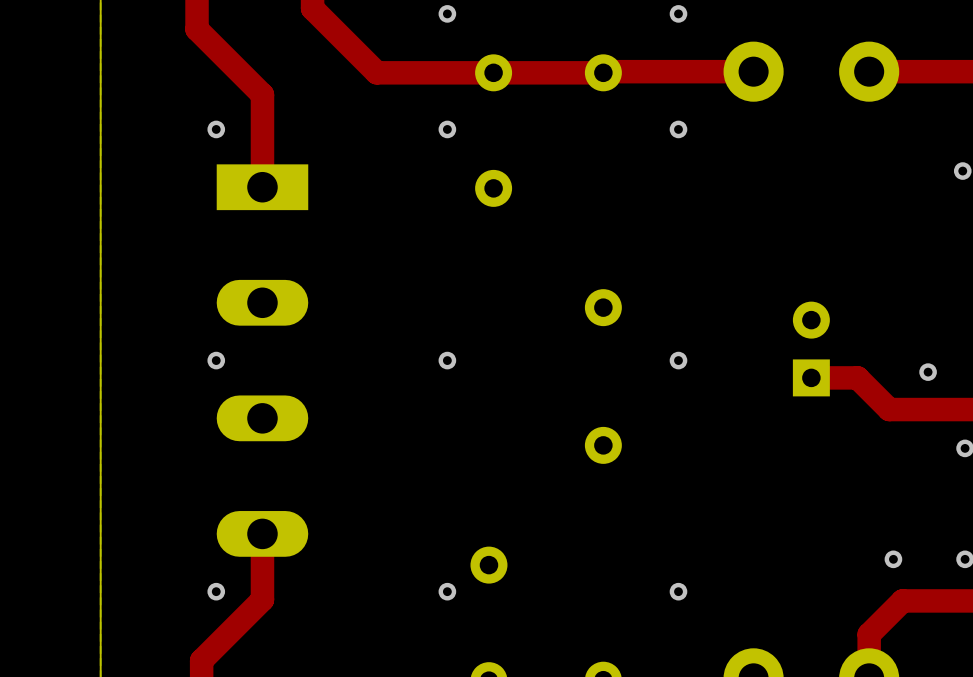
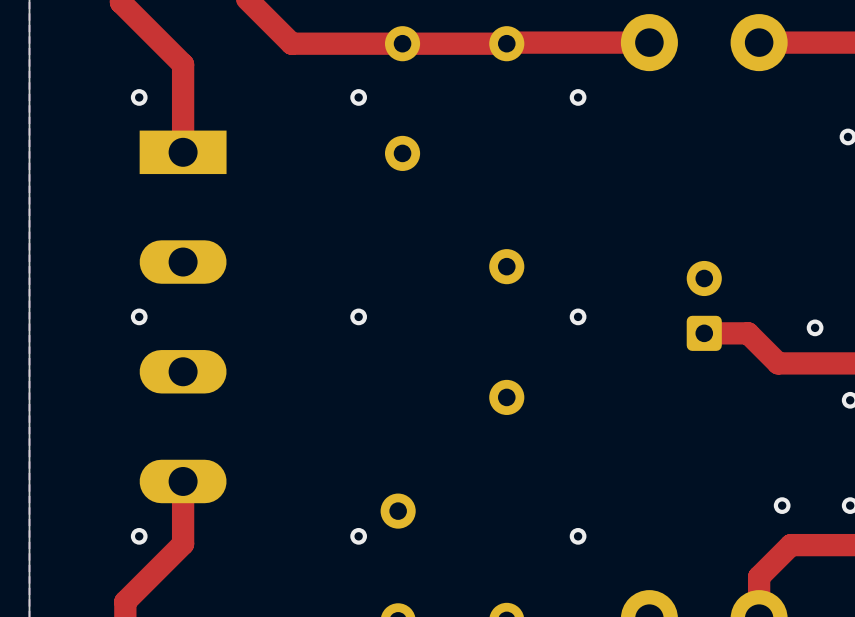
part footprint: [792, 301, 830, 397] -> [686, 260, 722, 351]

